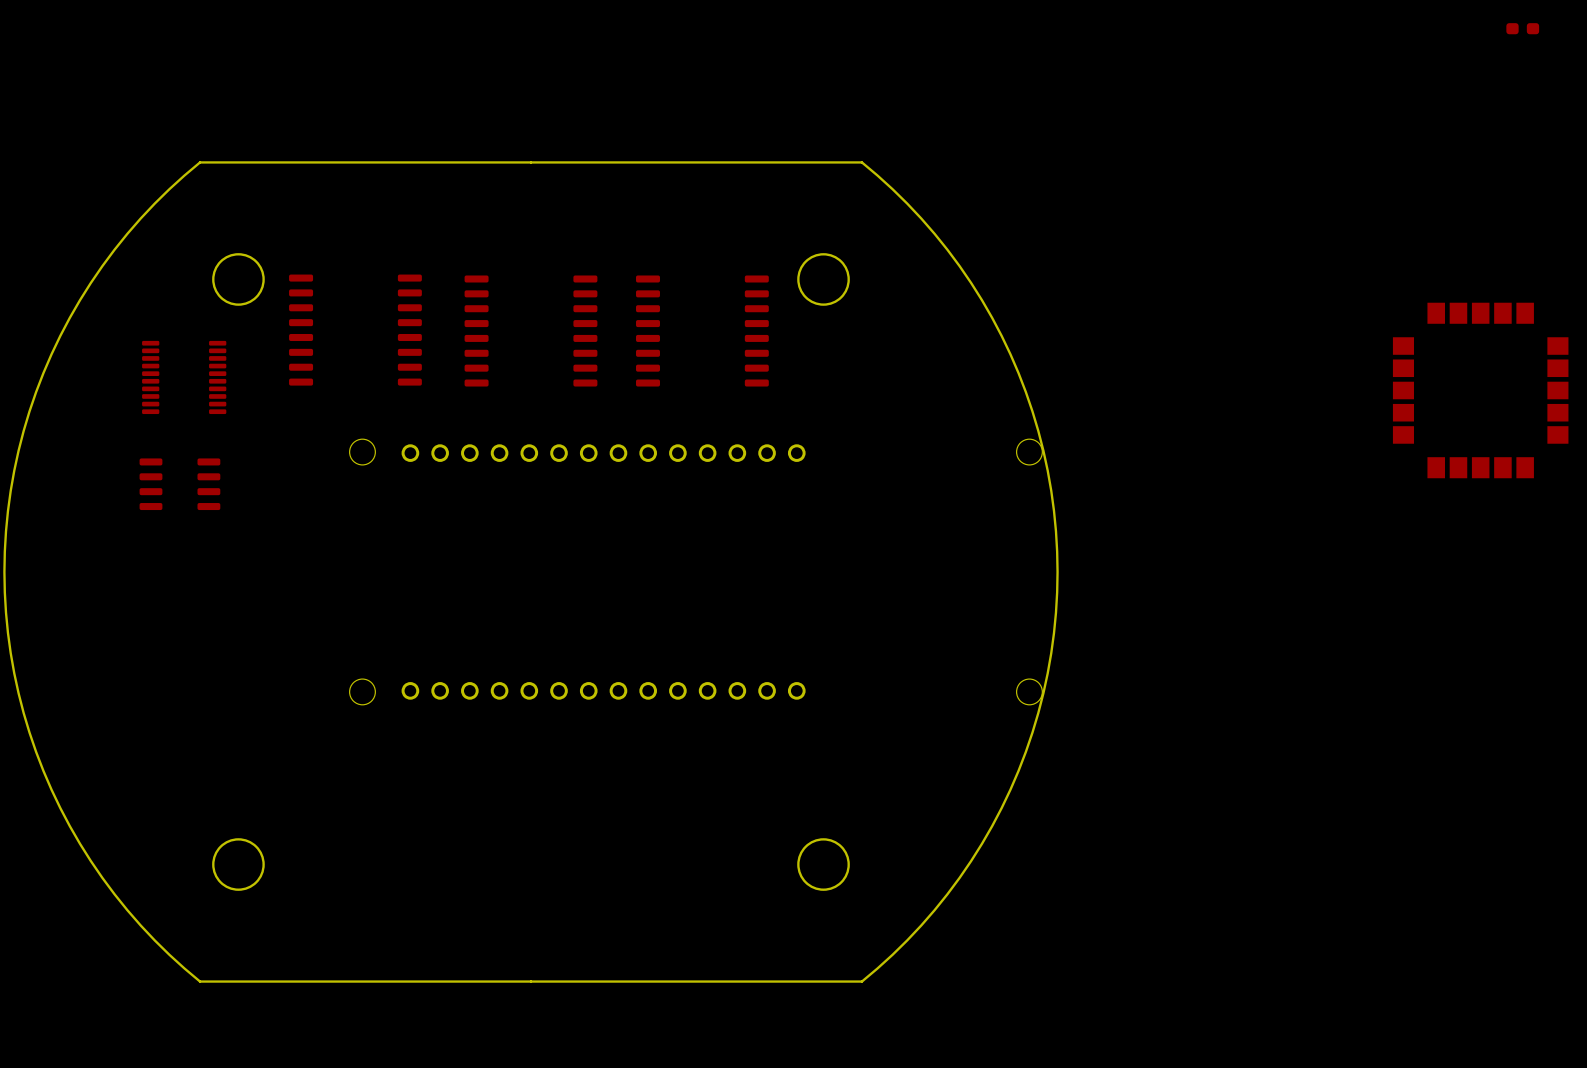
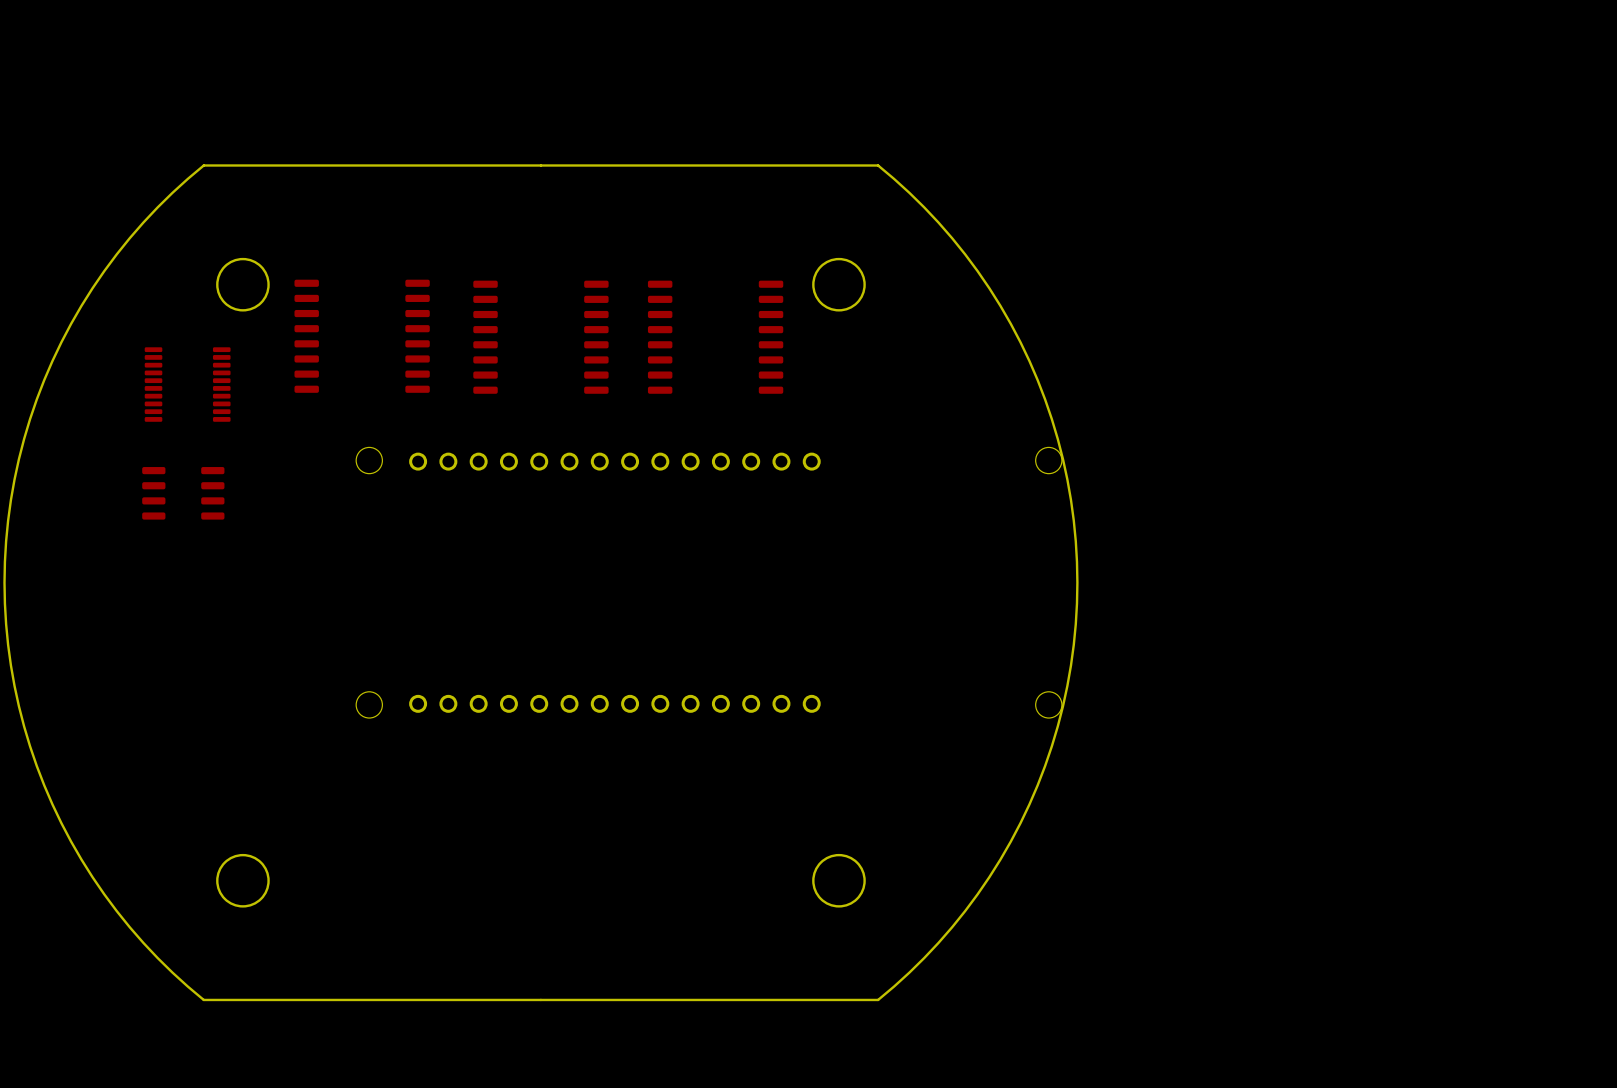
part: (1522, 28) -> none
part: (1480, 390) -> none

